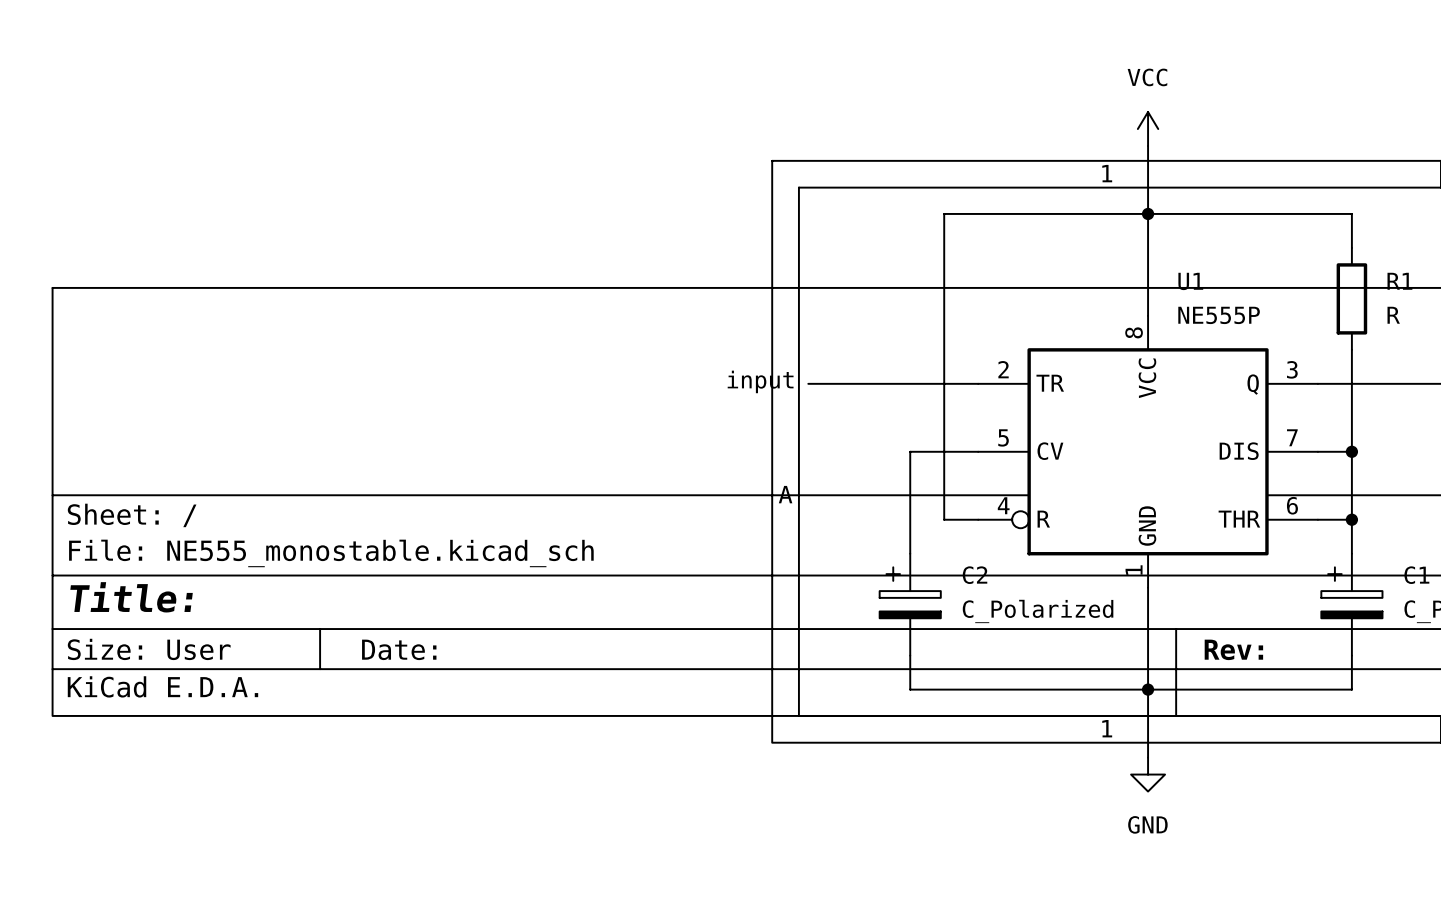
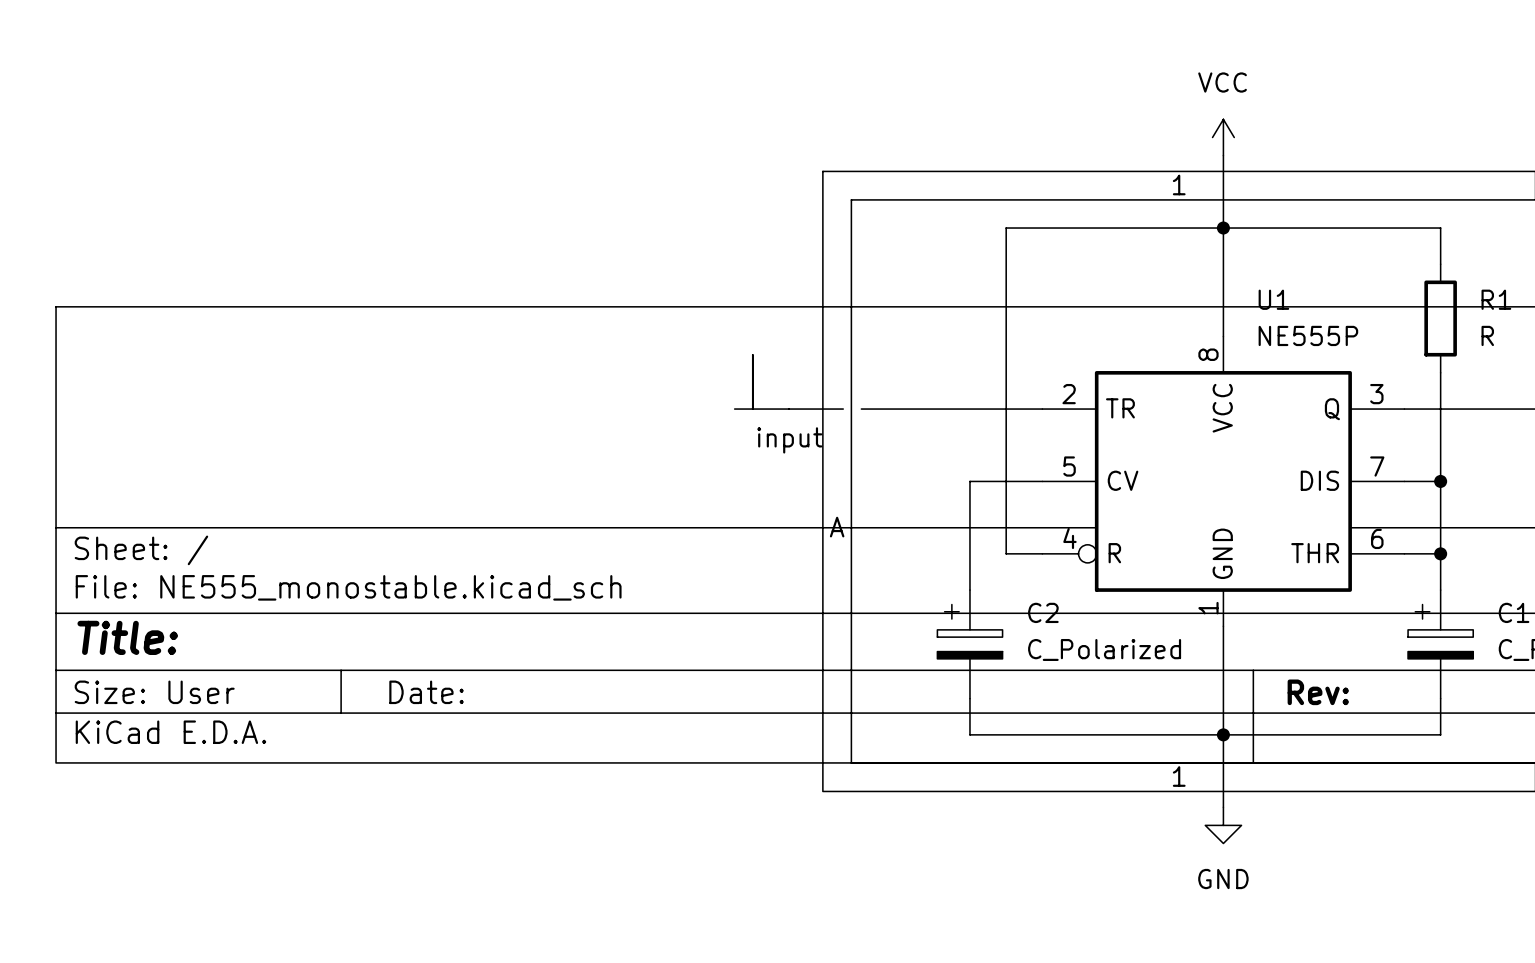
line: none -> (752, 354) (752, 409)
text position: input (760, 381) -> input (789, 440)
line: none -> (734, 409) (843, 409)

